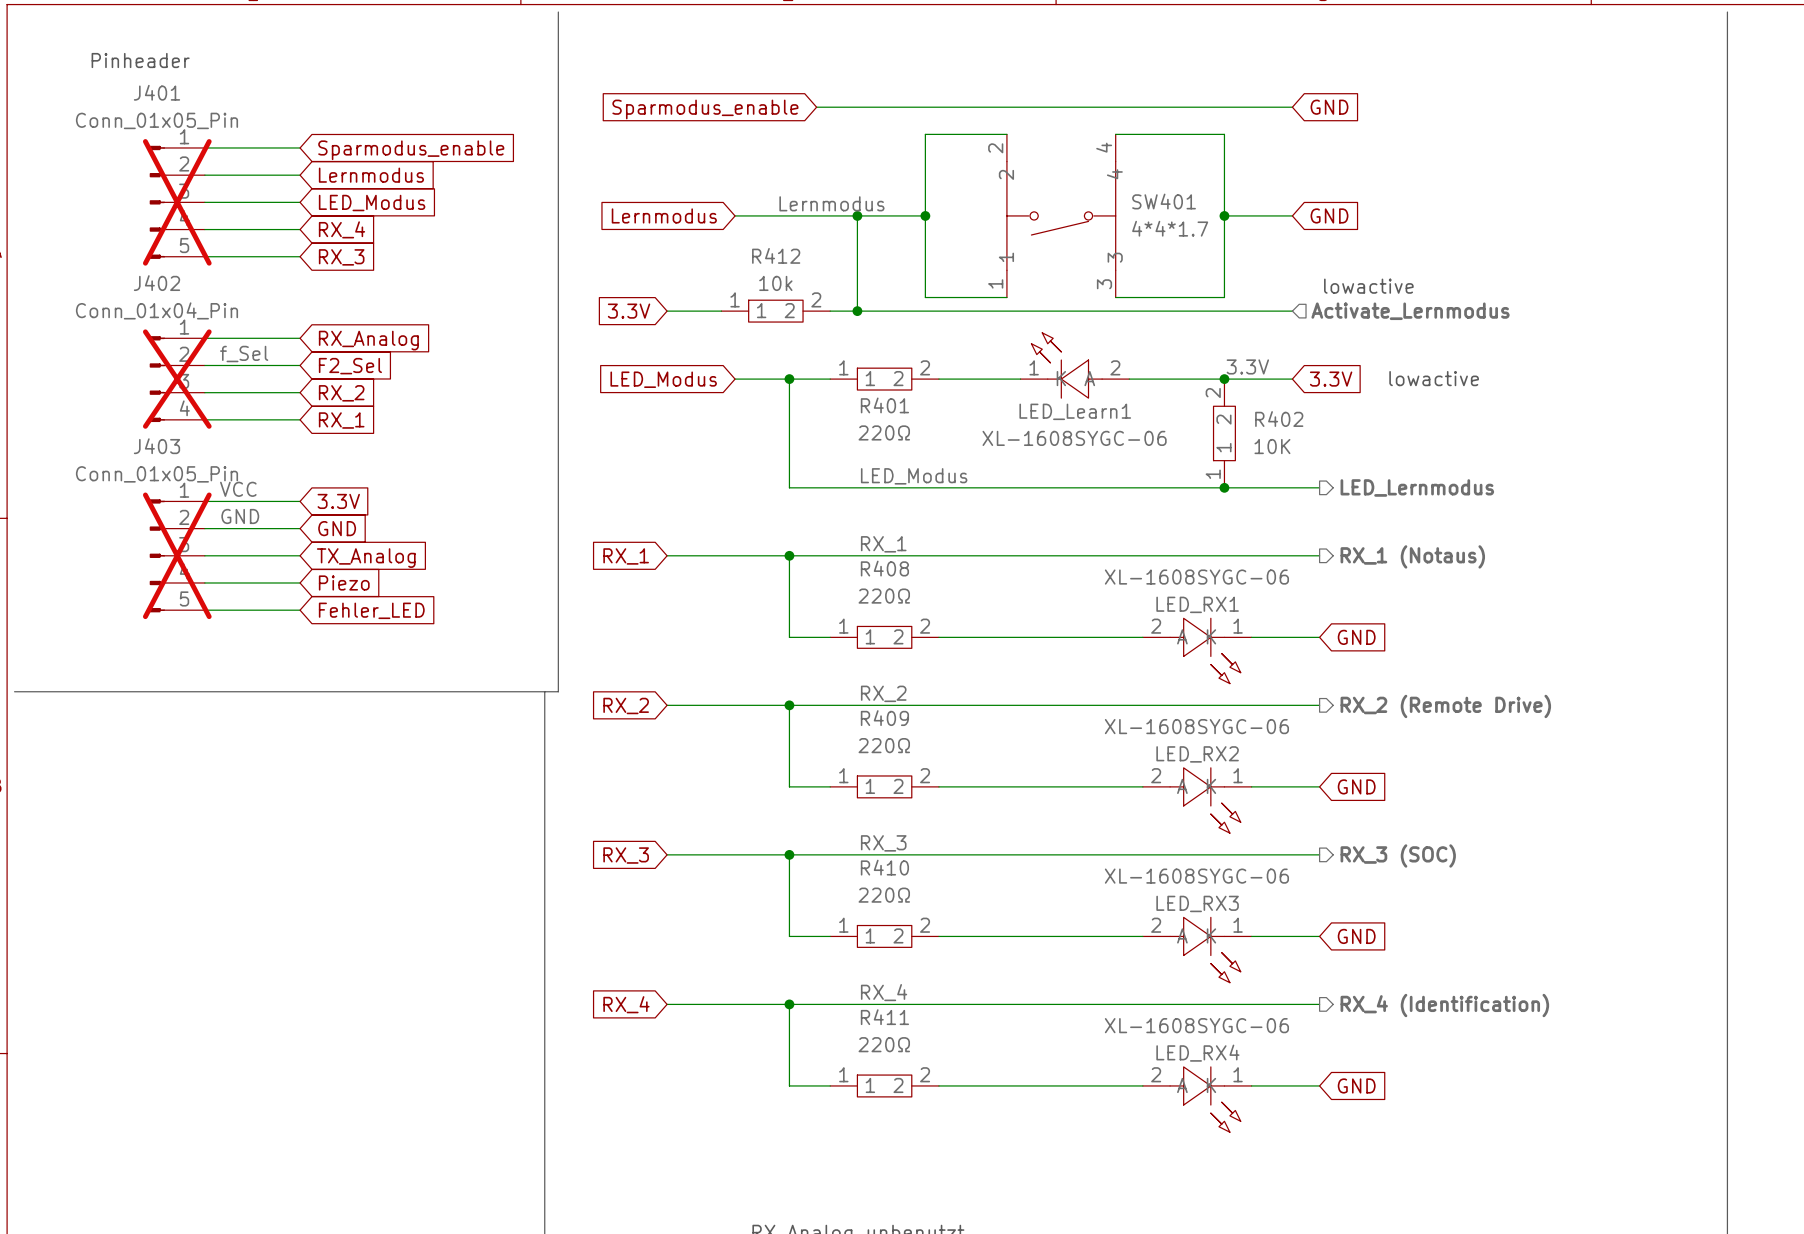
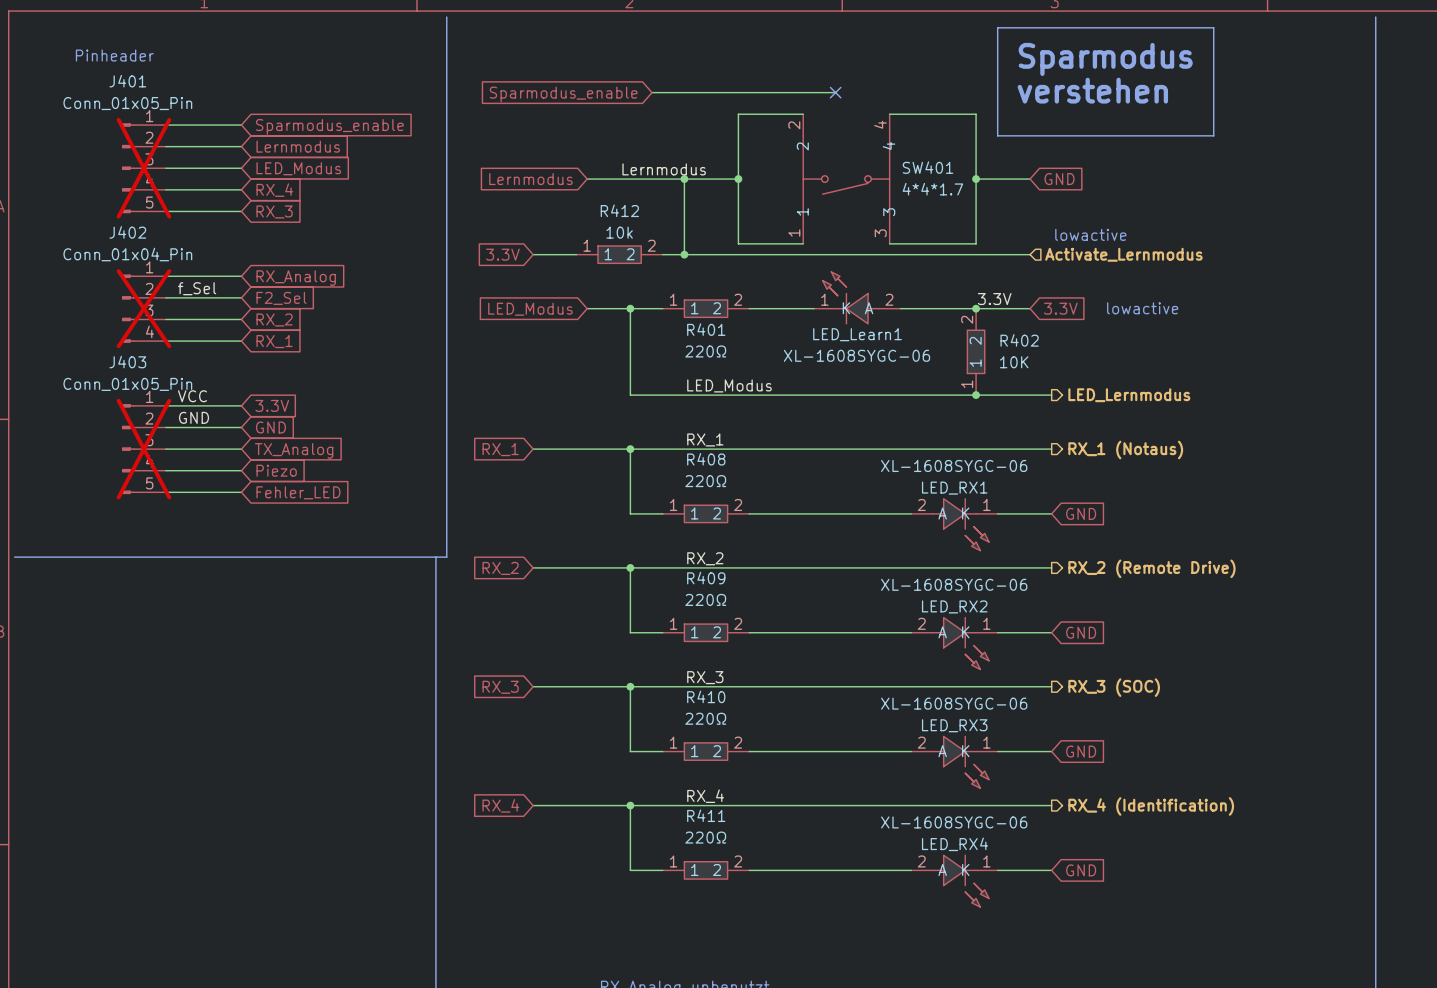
line: none -> (997, 27) (1213, 27) (1213, 135) (997, 135) (997, 27)
text: none -> Sparmodus (1105, 59)
text: none -> verstehen (1092, 90)
wire: (1047, 107) (1292, 107) -> none
no-connect mark: none -> (835, 92)
global label: GND (1329, 107) -> none

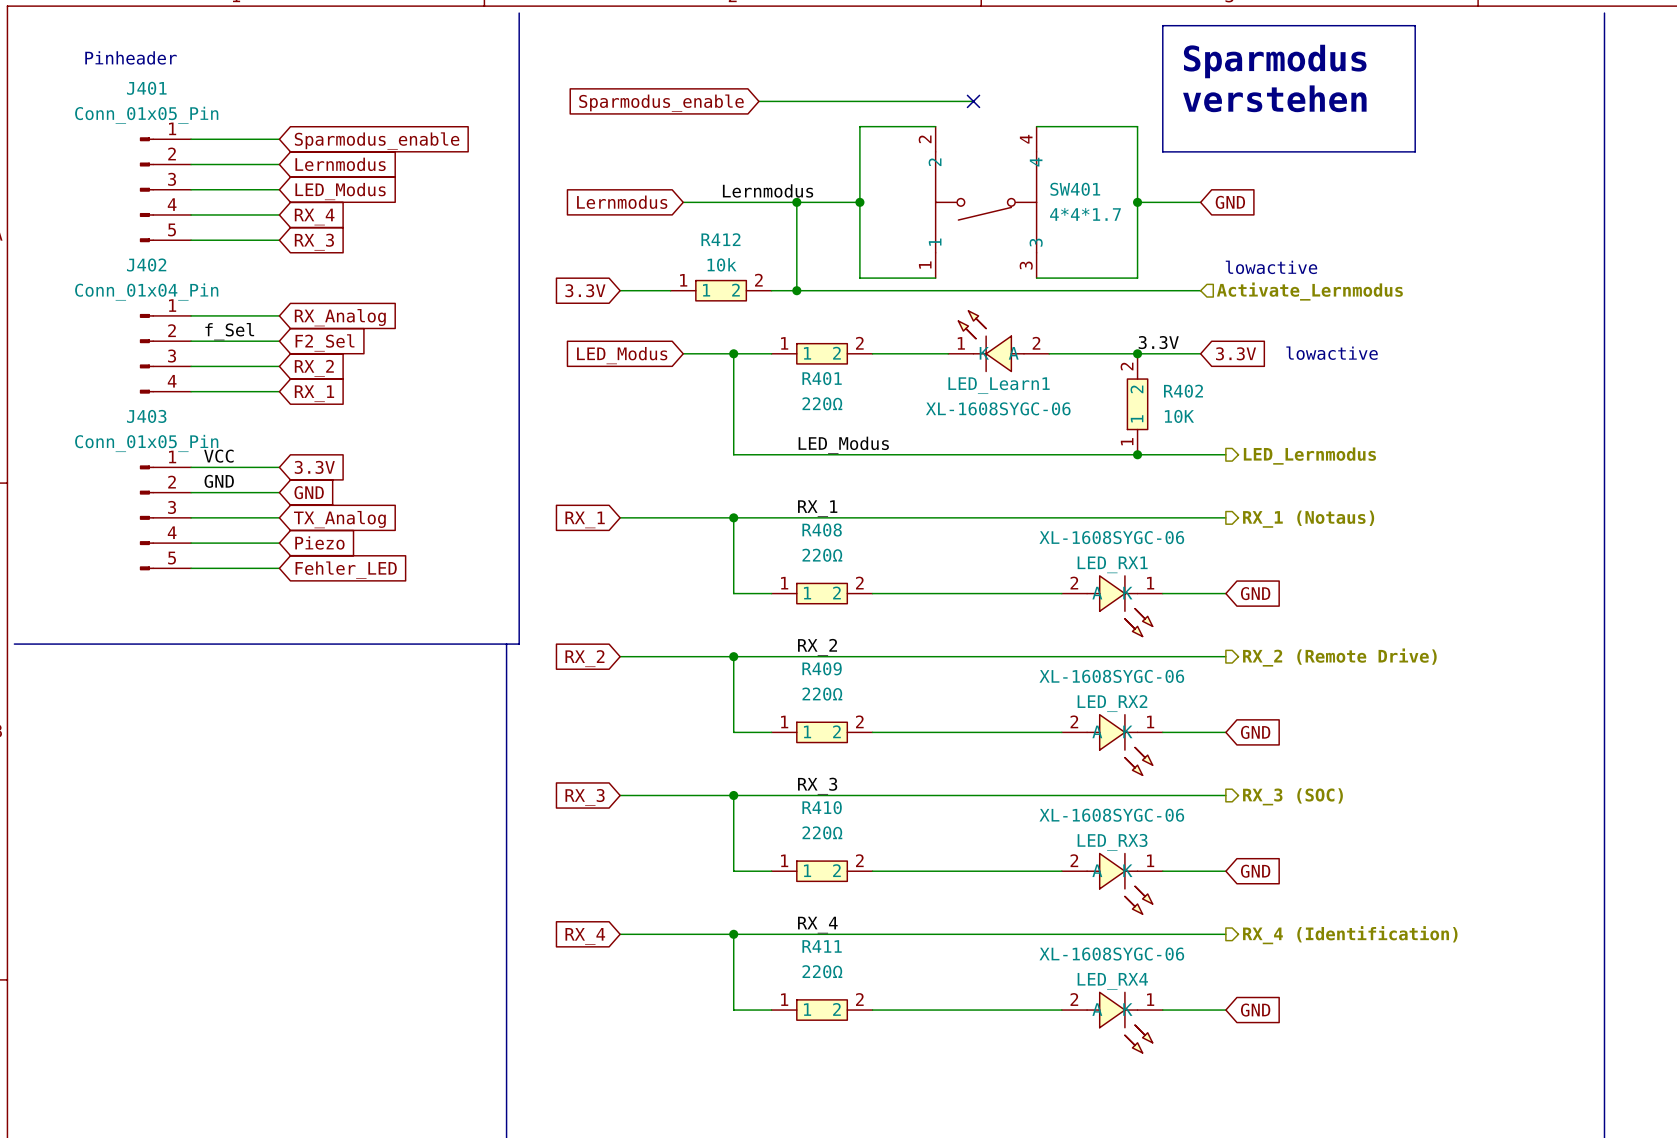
J401 do-not-place cross: (143, 168) -> none
J402 do-not-place cross: (143, 308) -> none
J403 do-not-place cross: (143, 449) -> none

